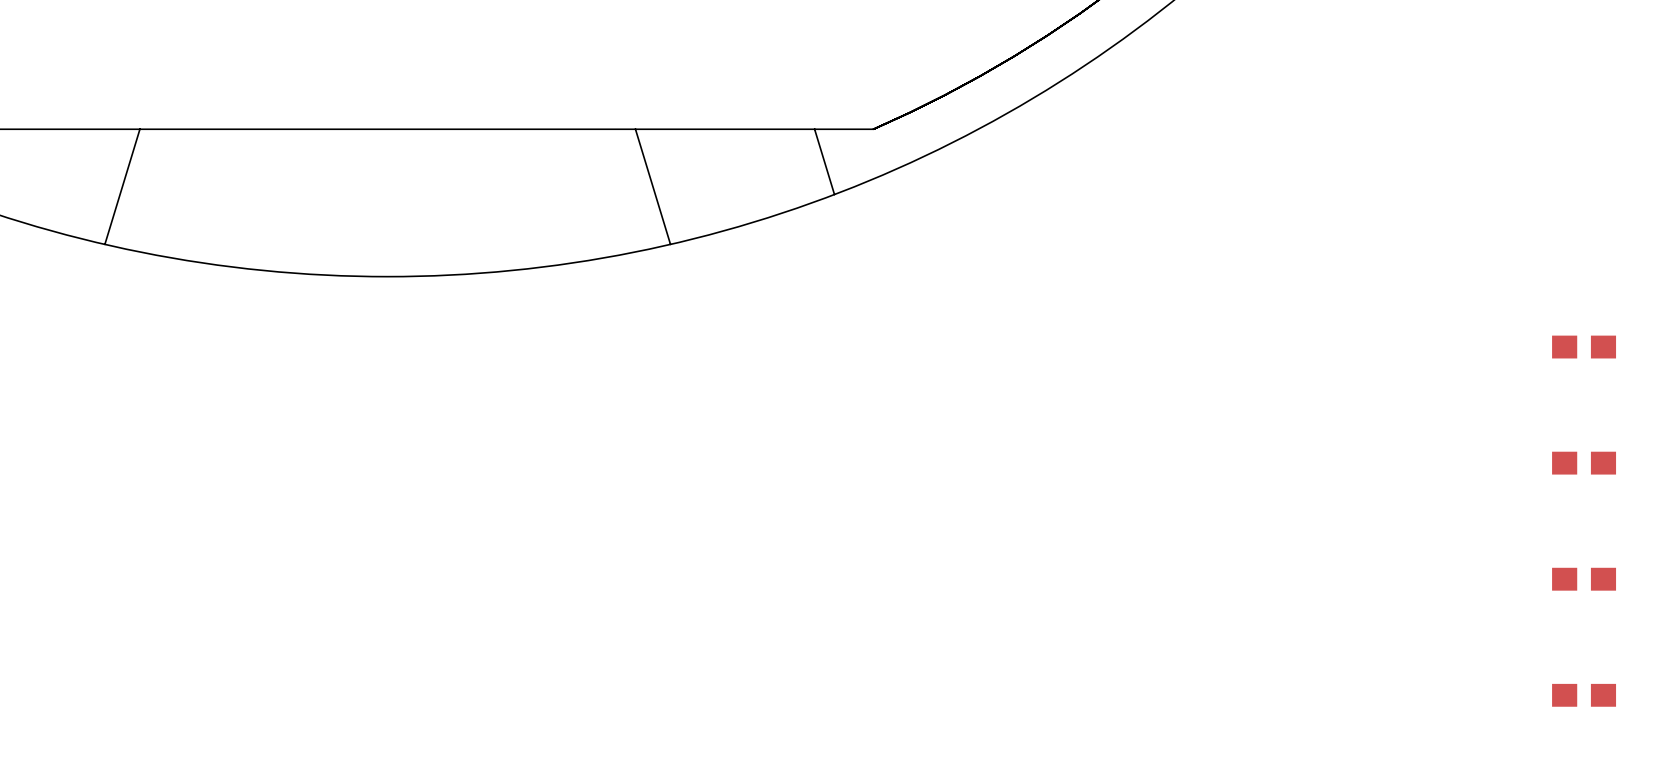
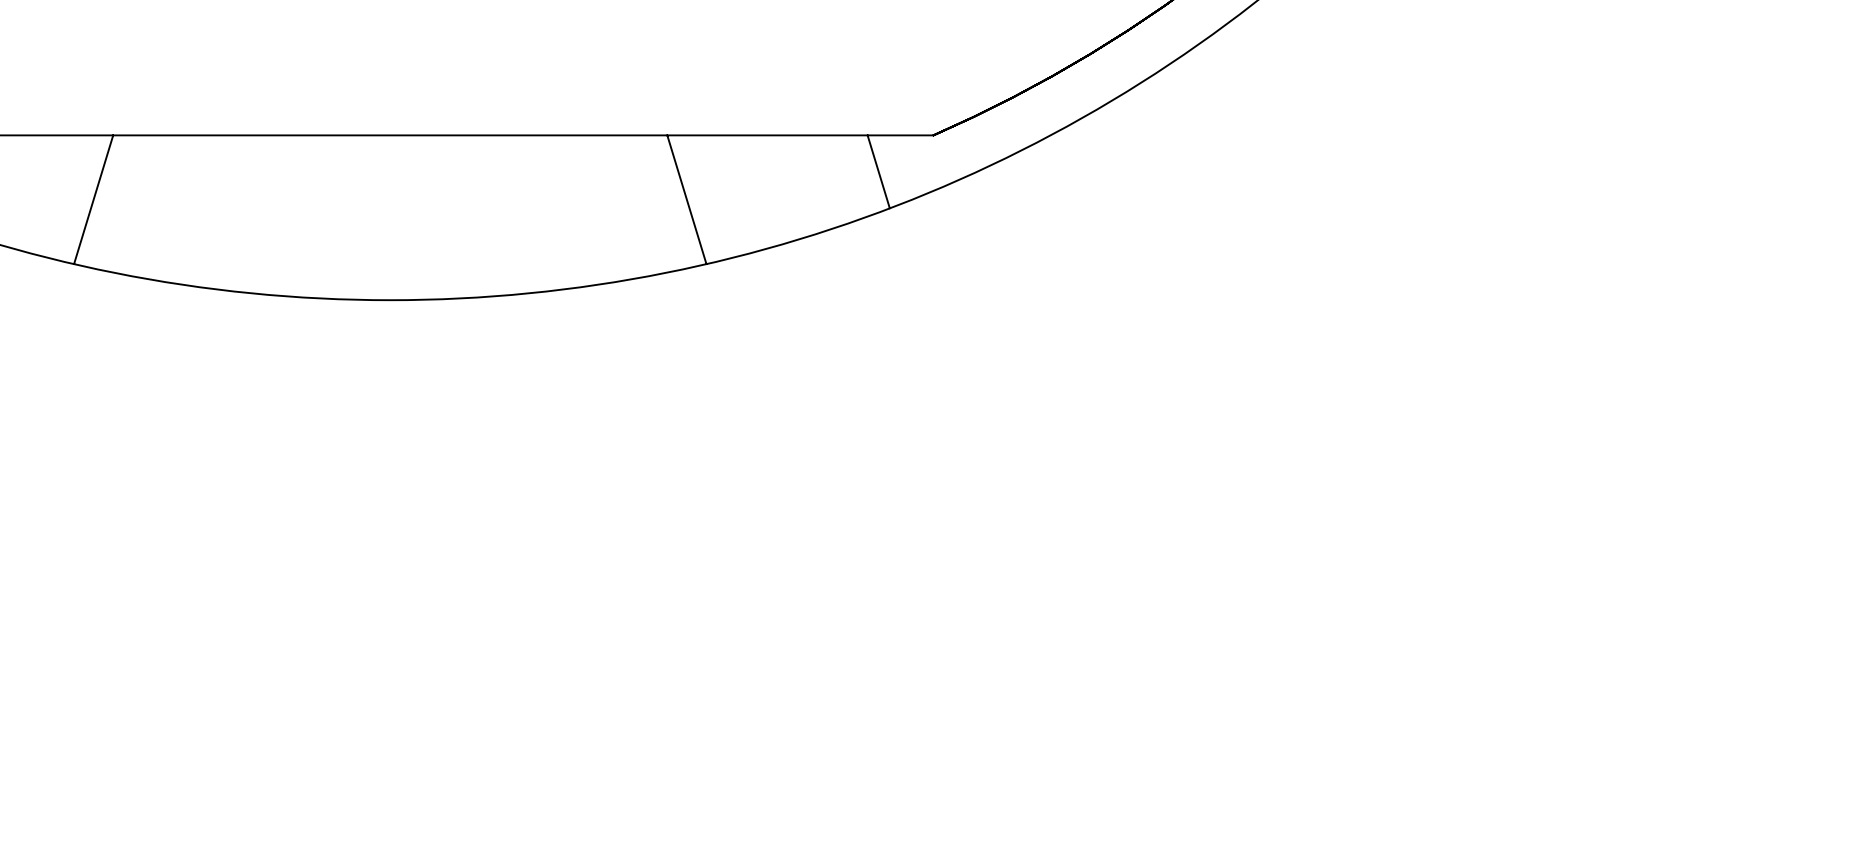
part: (1584, 347) -> none
part: (1584, 463) -> none
part: (1584, 579) -> none
part: (1584, 695) -> none

